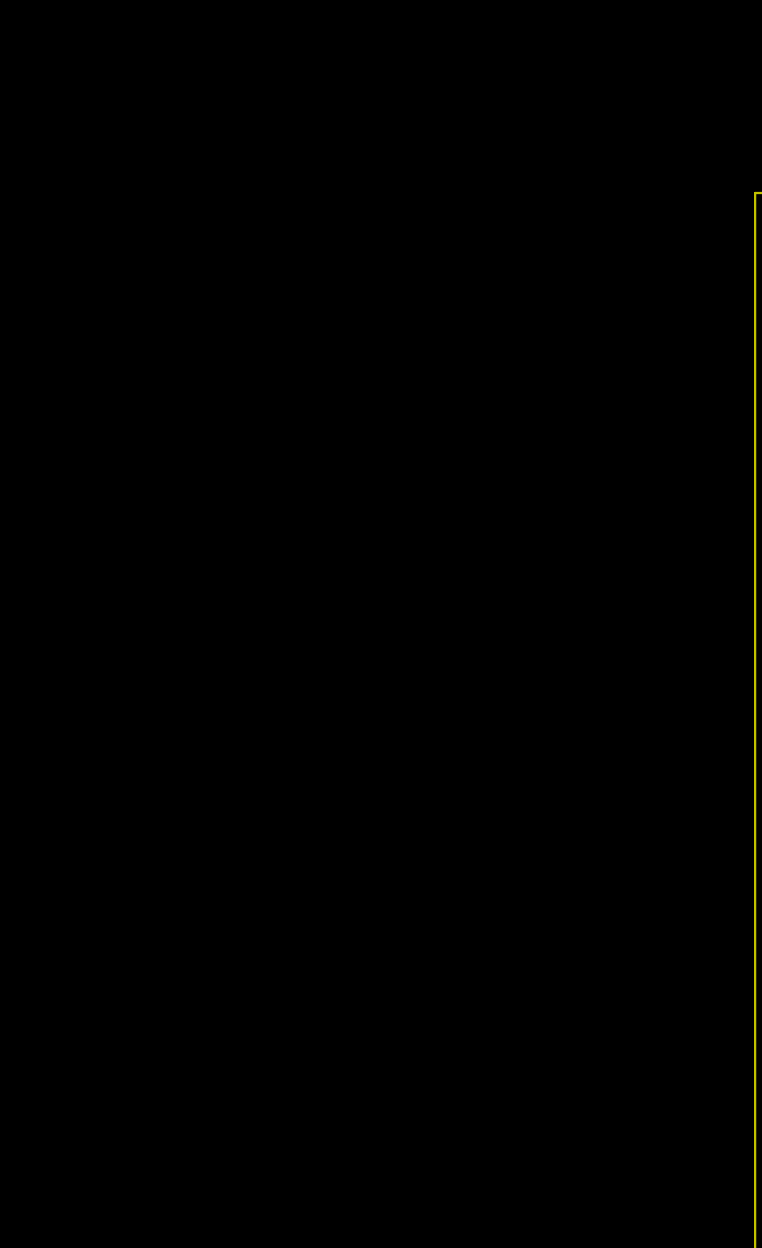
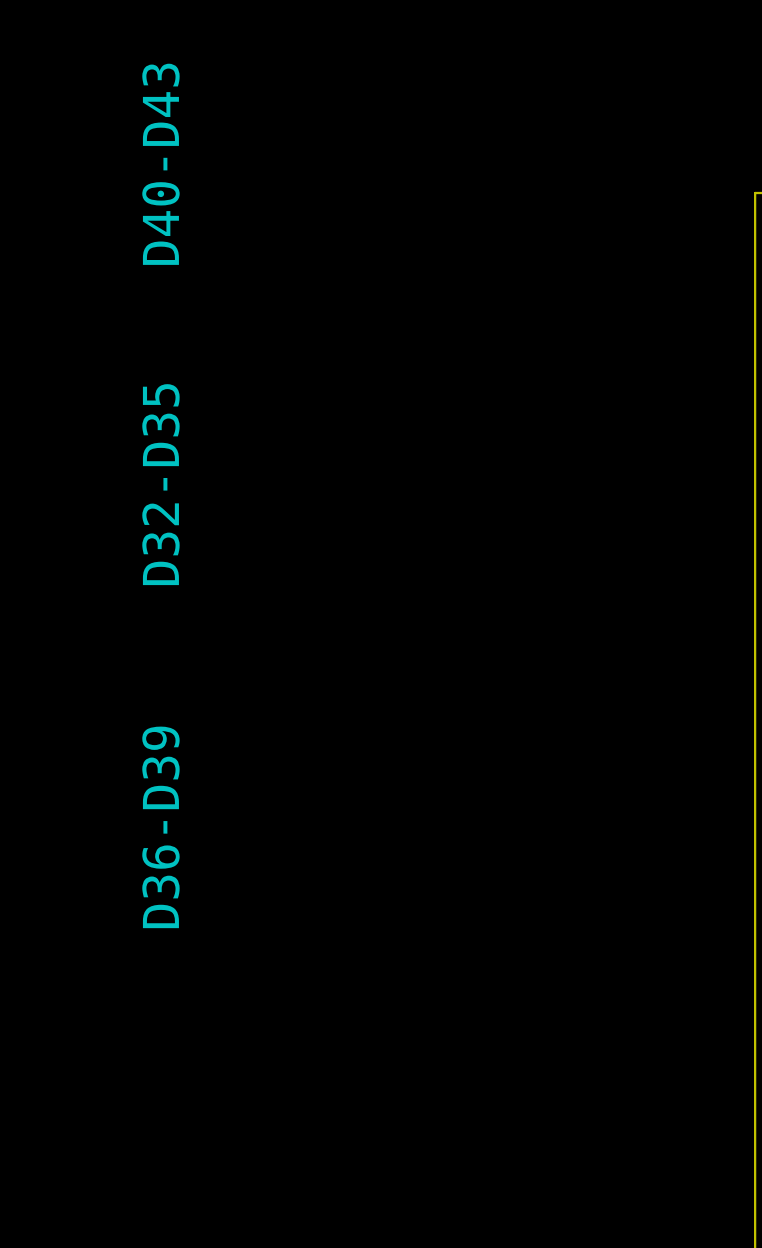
text: none -> D40-D43 (160, 164)
text: none -> D32-D35 (160, 484)
text: none -> D36-D39 (160, 827)

